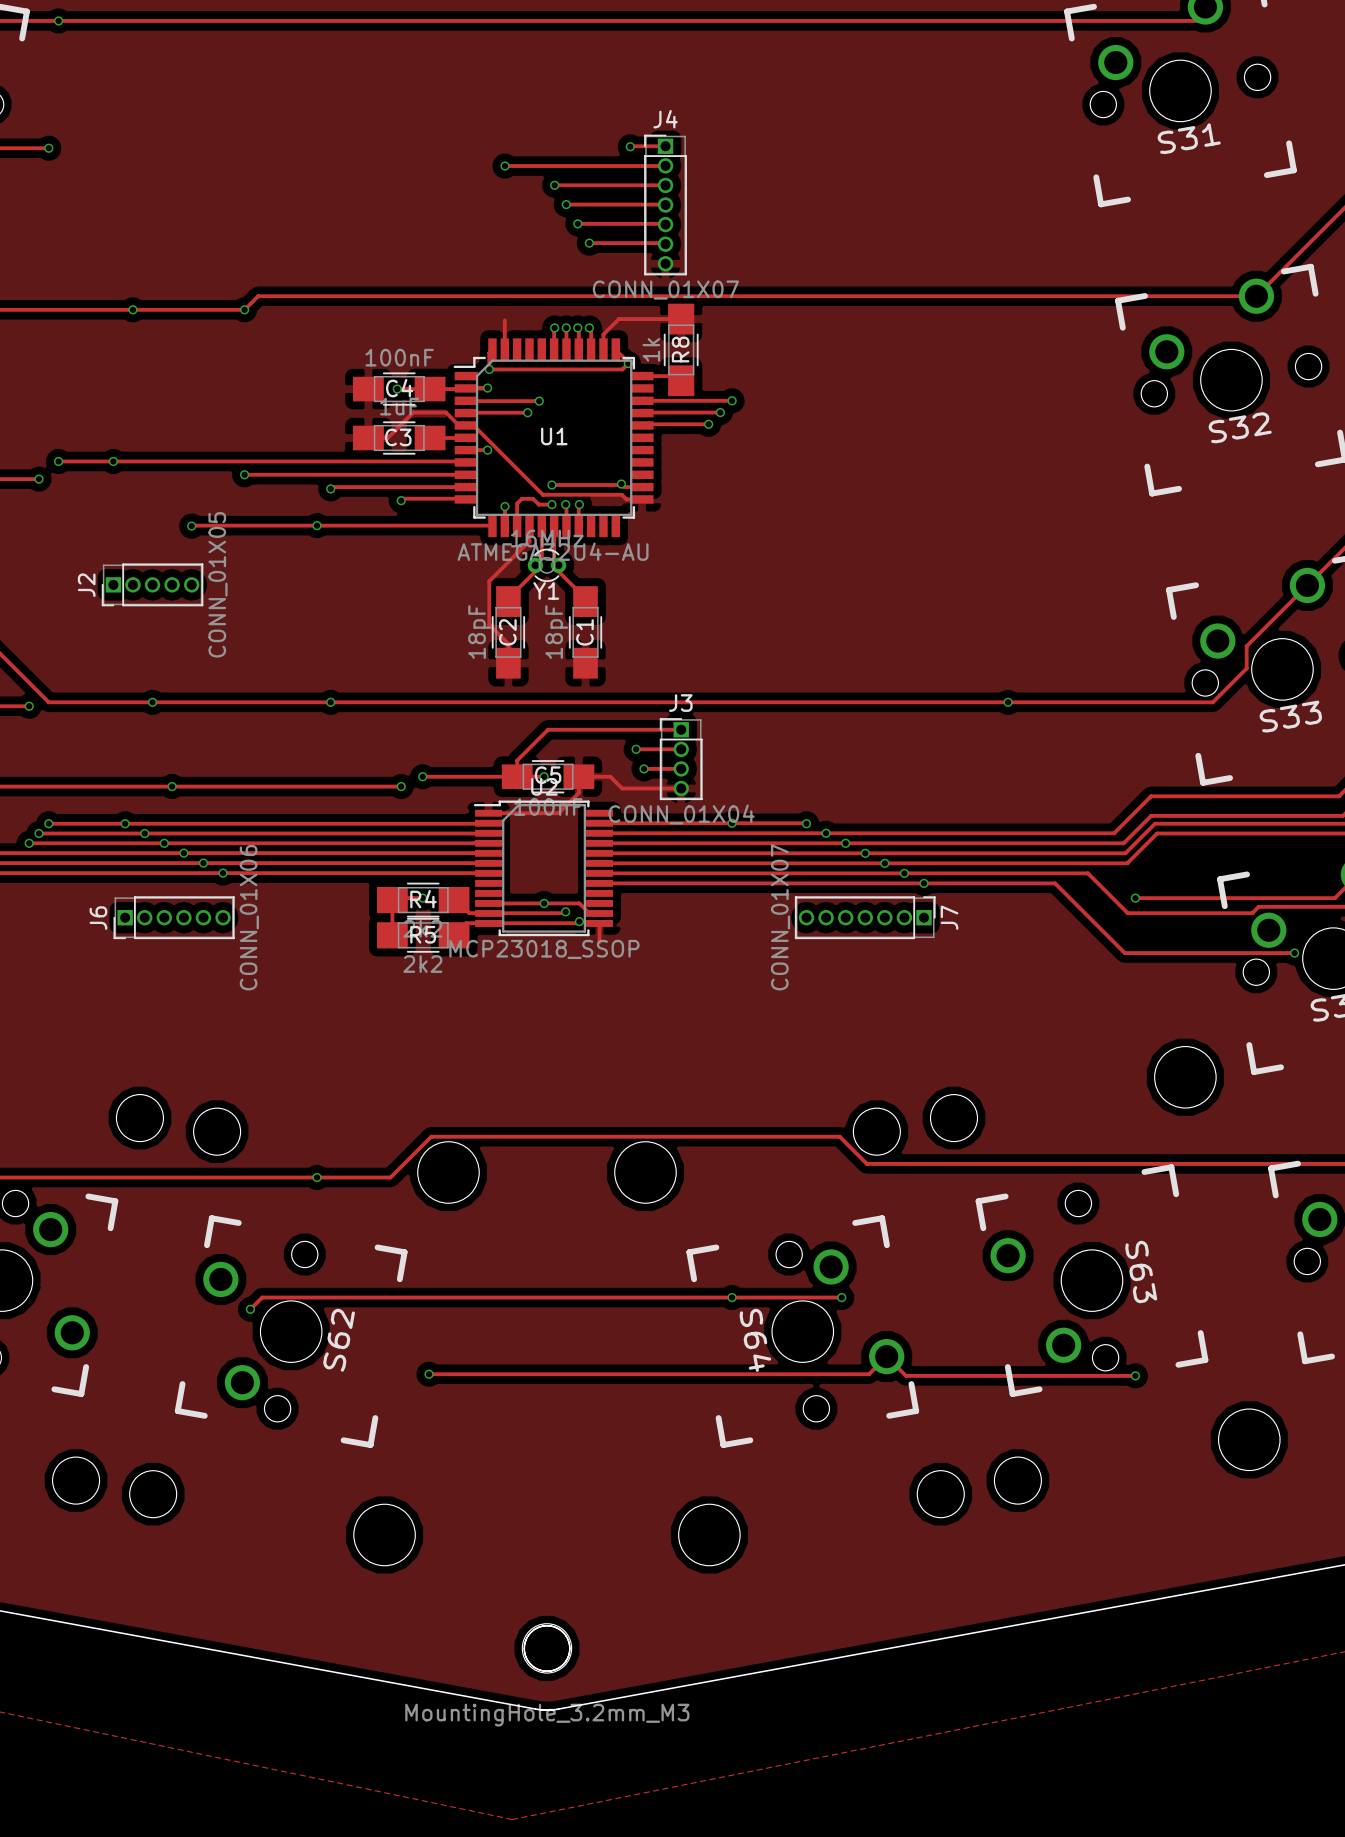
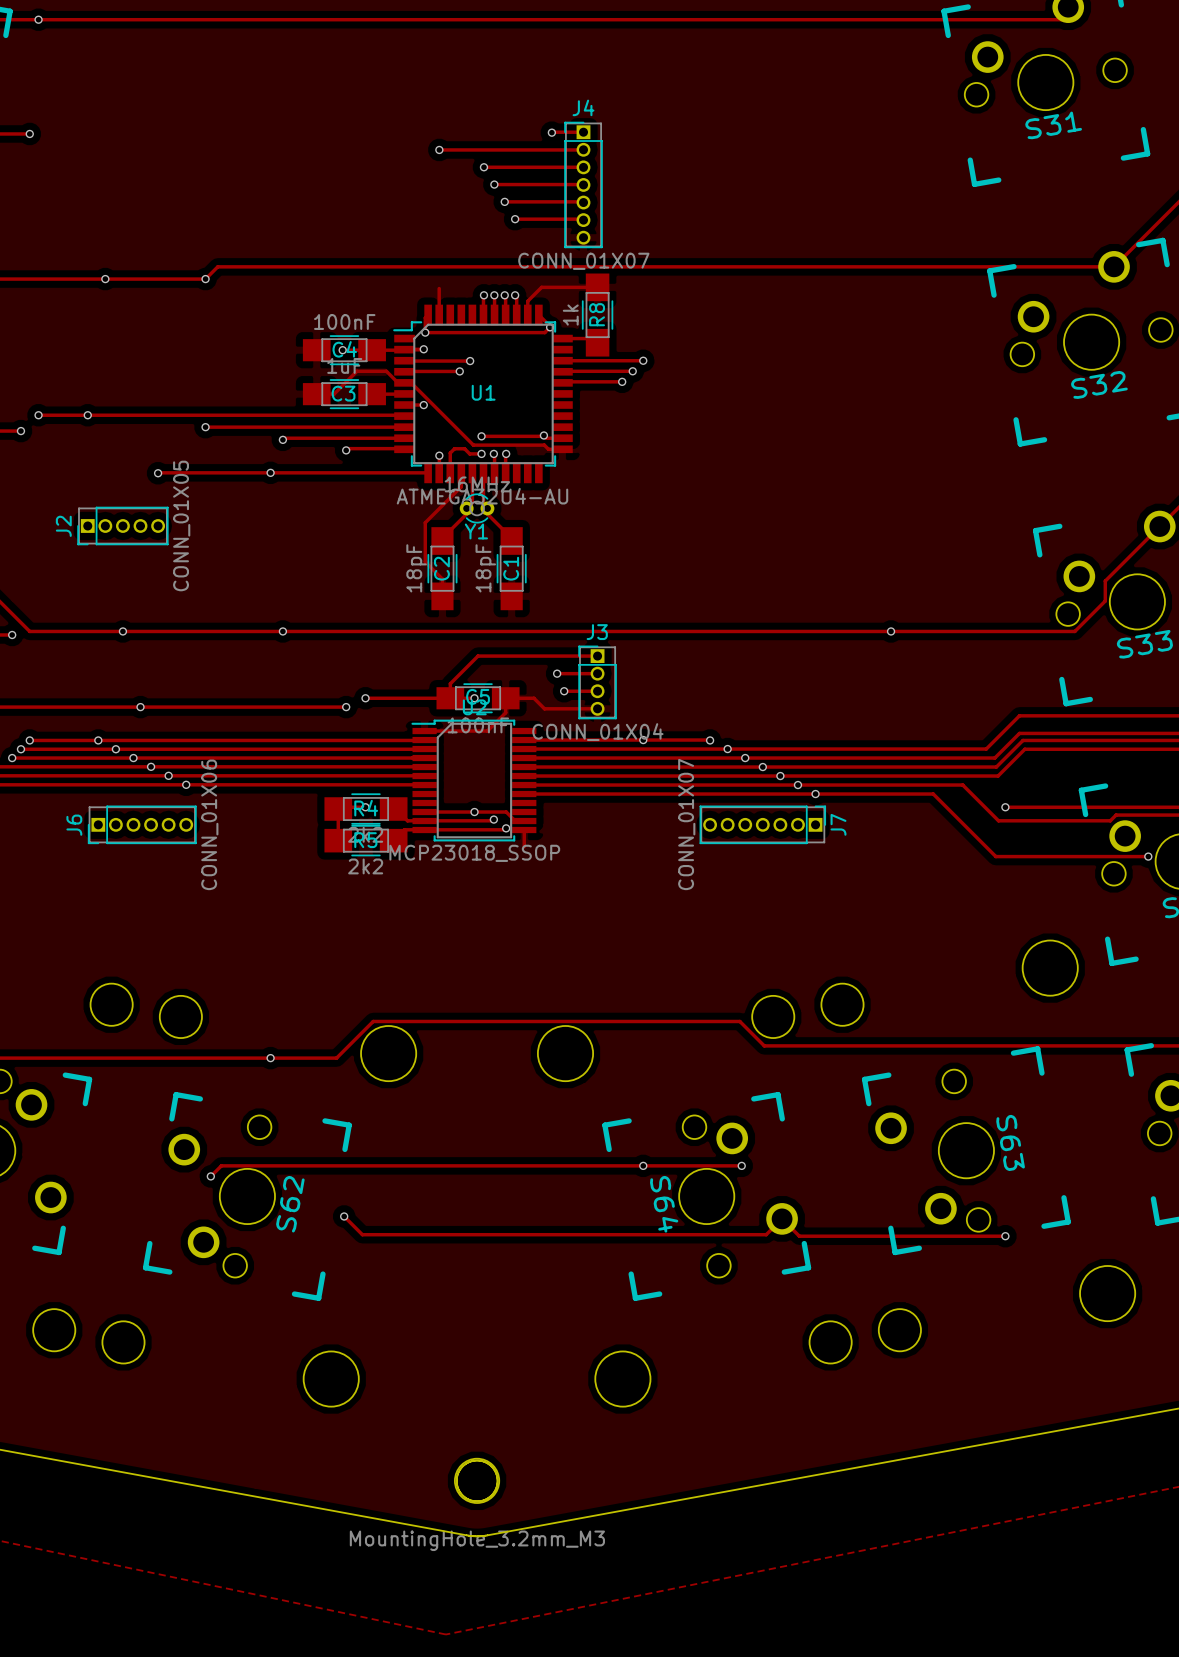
track: none -> (344, 1216) (362, 1234) (371, 1234)
via position: (429, 1374) -> (344, 1216)

